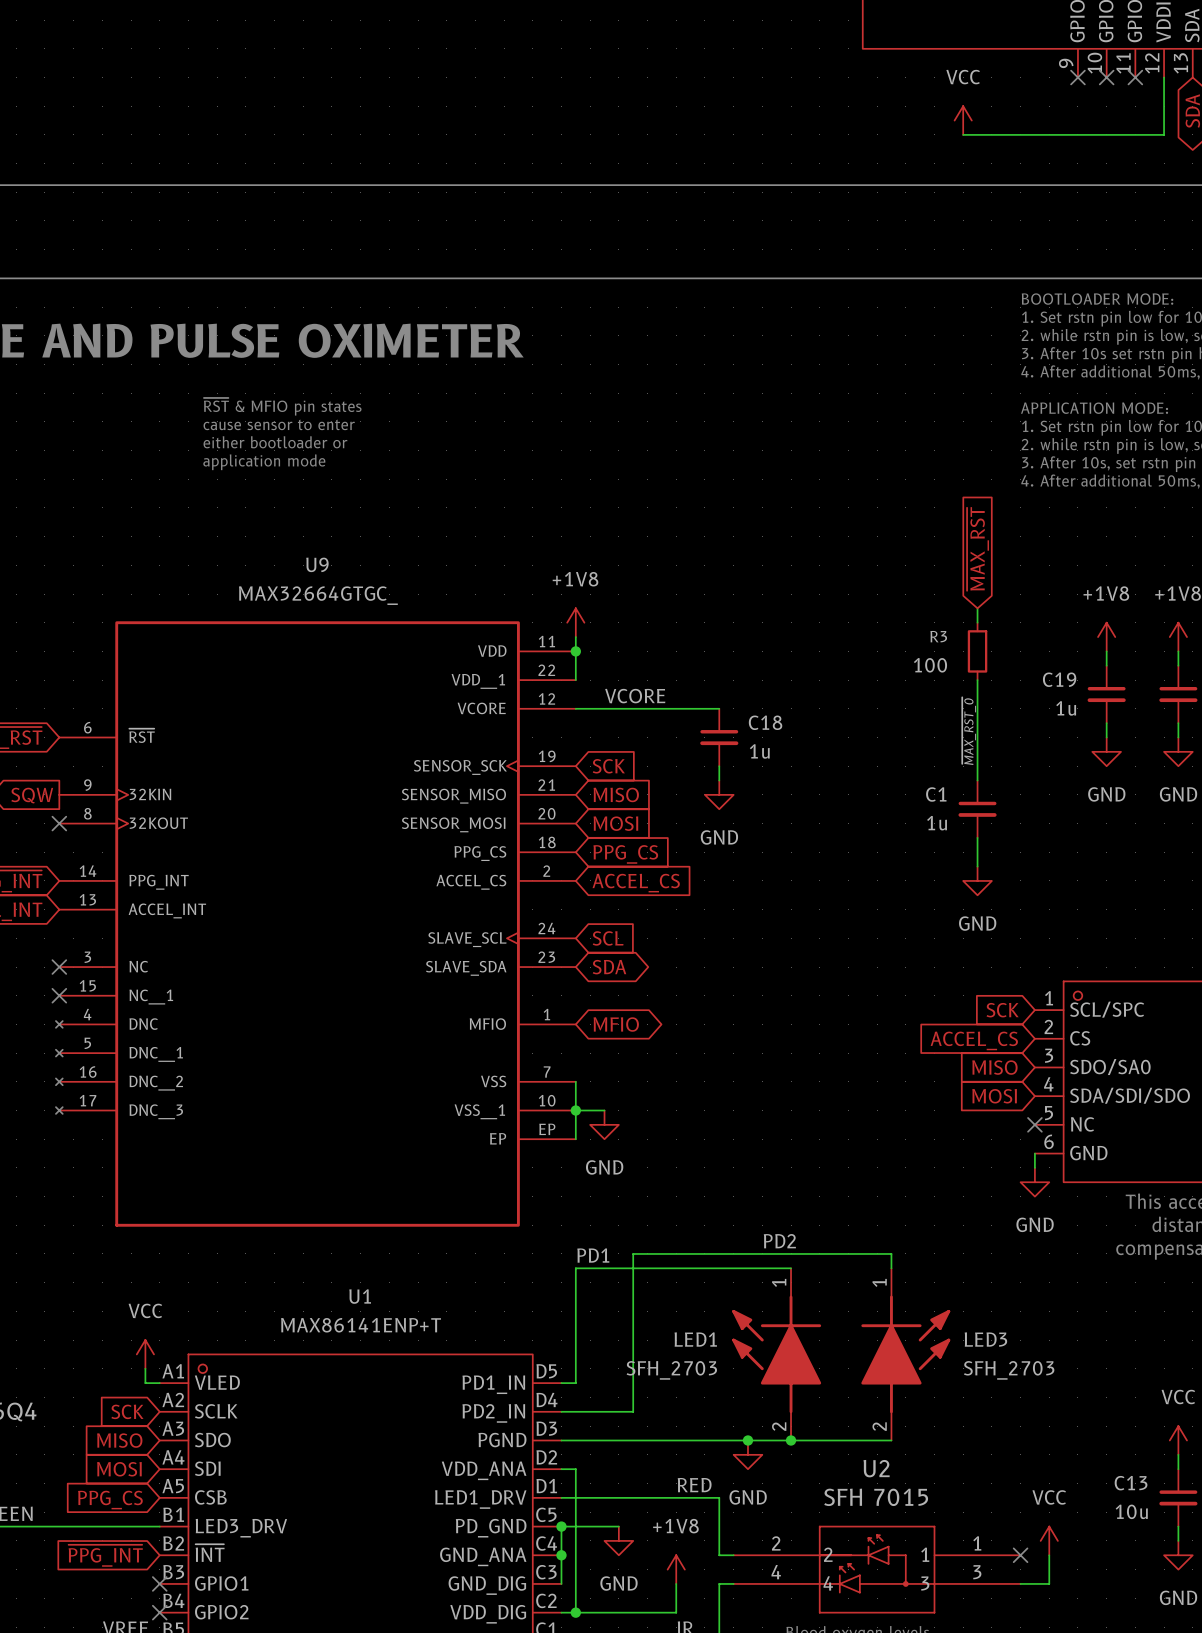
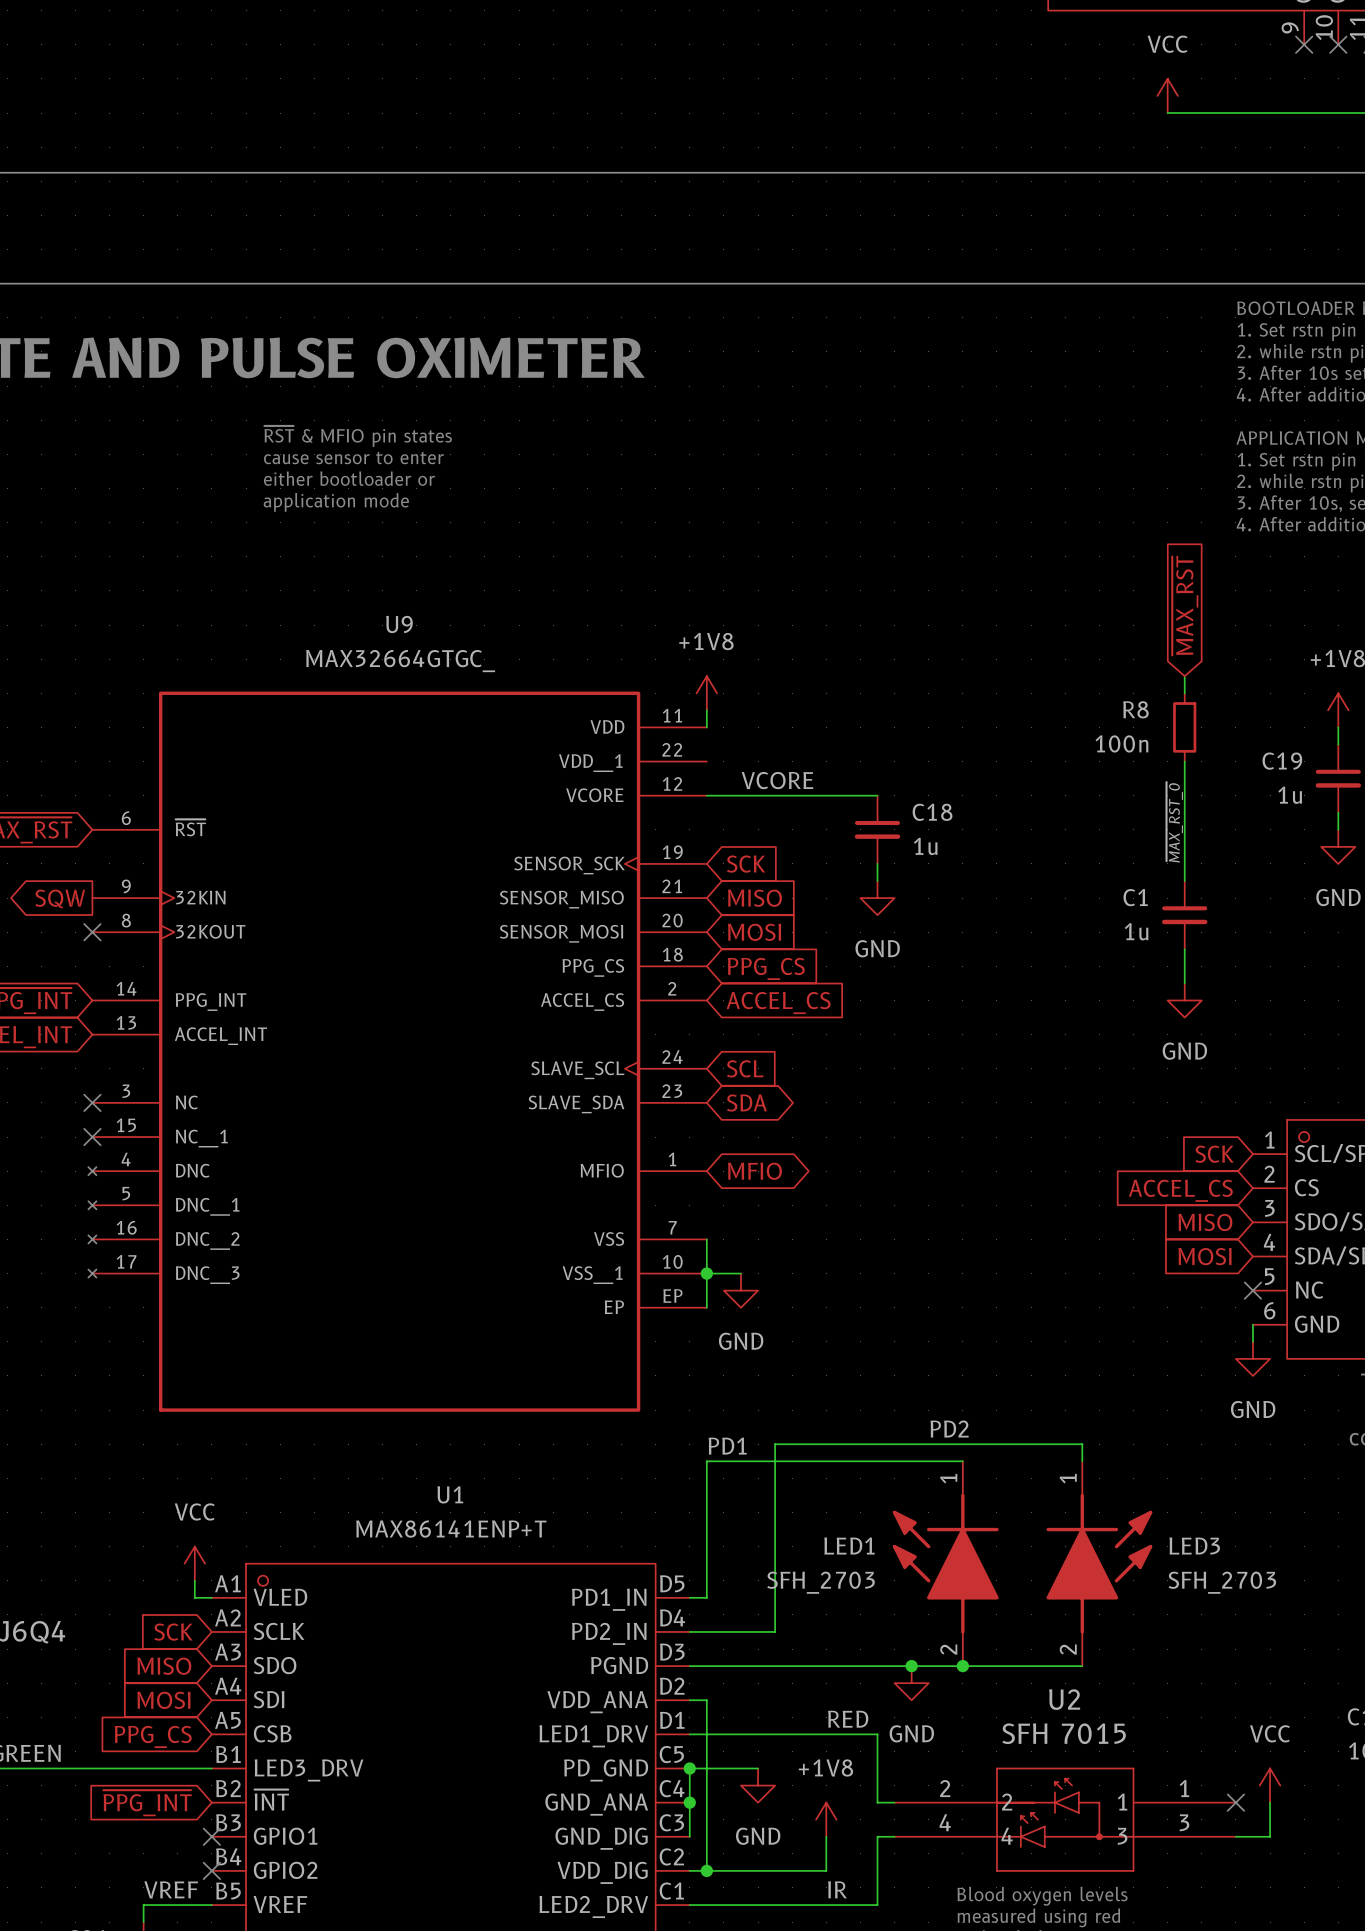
R3 name: R3 (938, 636) -> R8 (1135, 709)
wire: (575, 651) (575, 680) -> none
junction: (575, 651) -> none
R3 value: 100 (930, 665) -> 100n (1121, 743)

